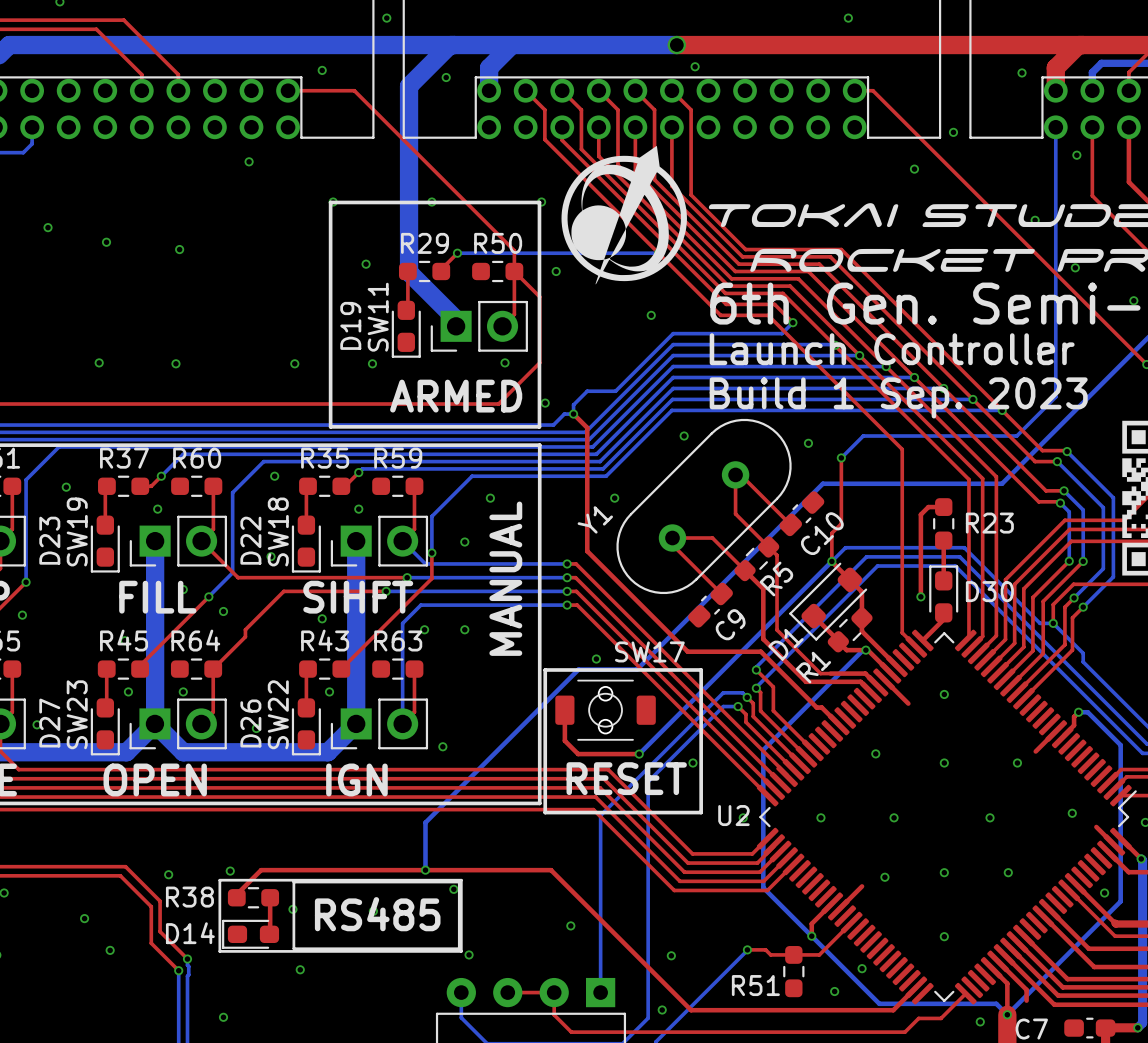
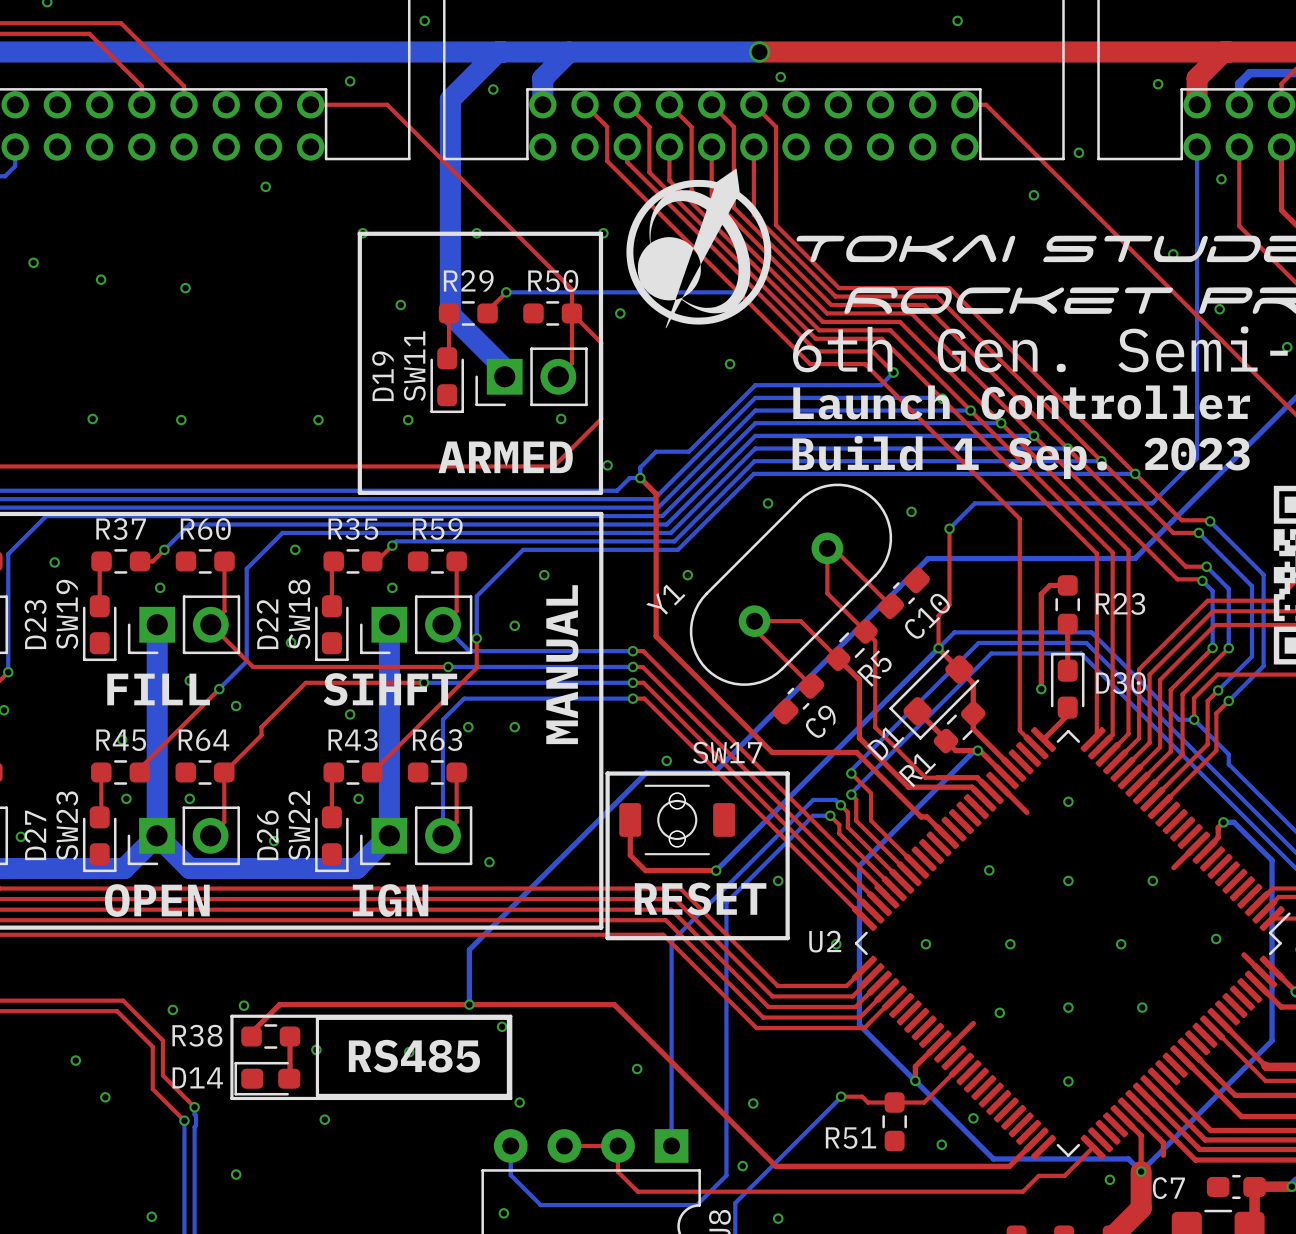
via: (1104, 893) -> none

